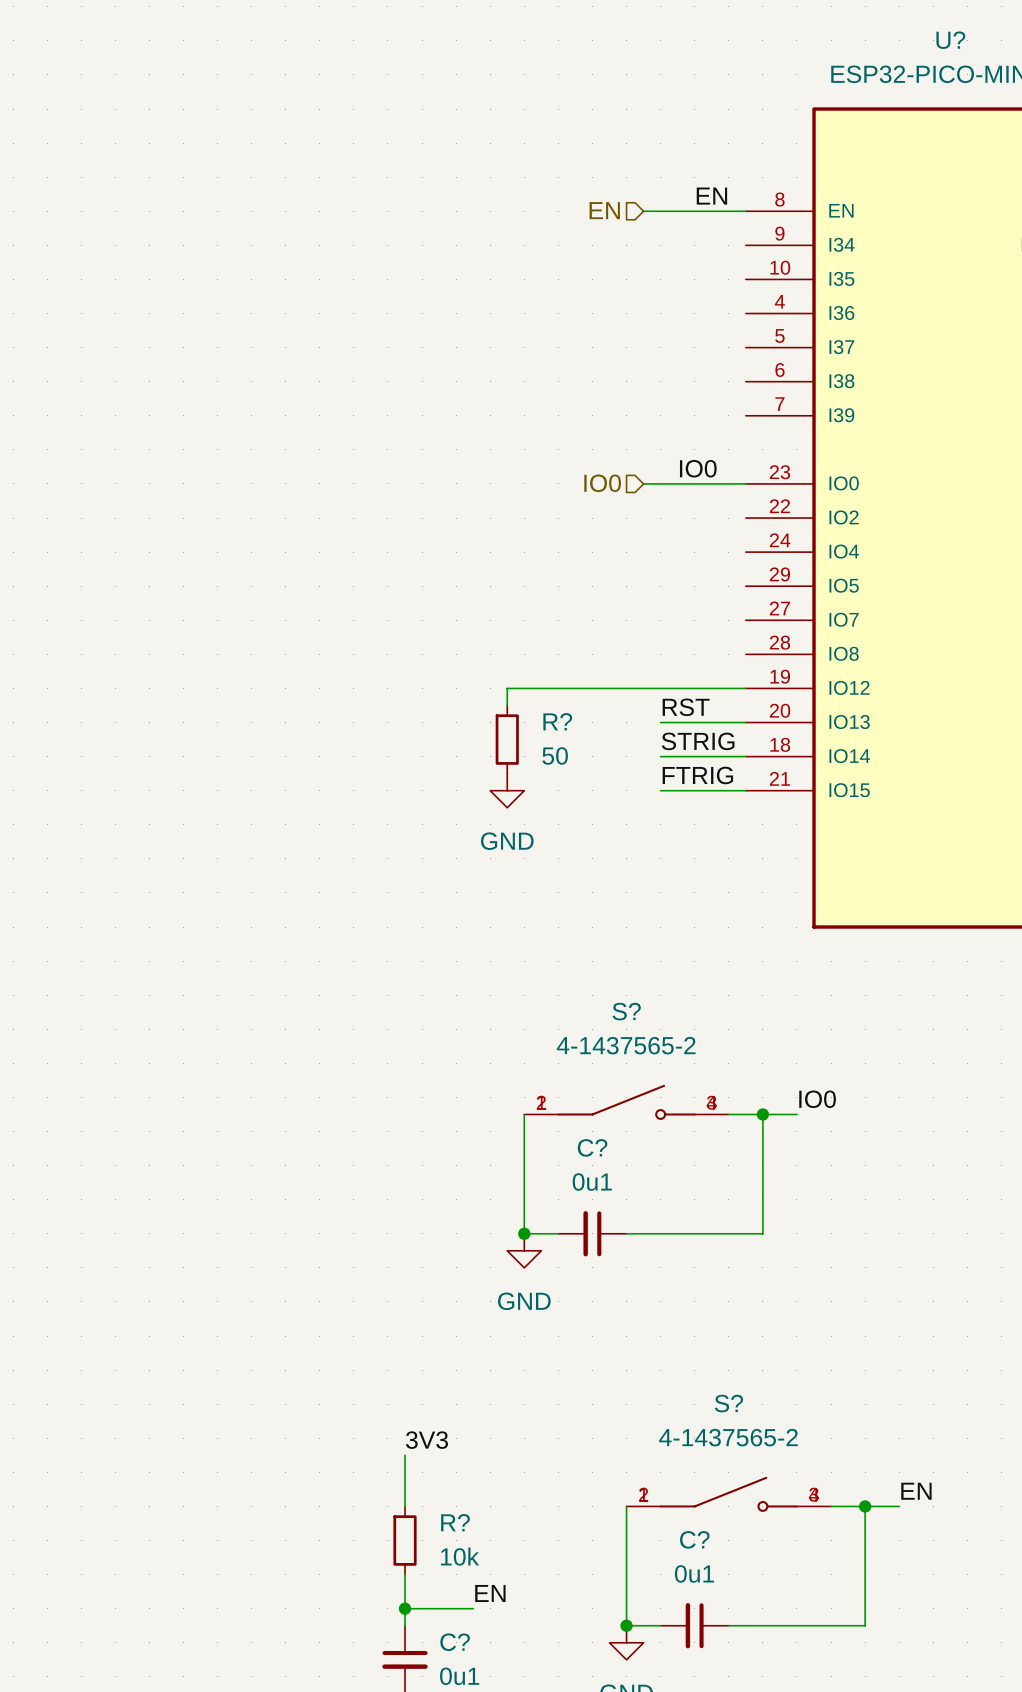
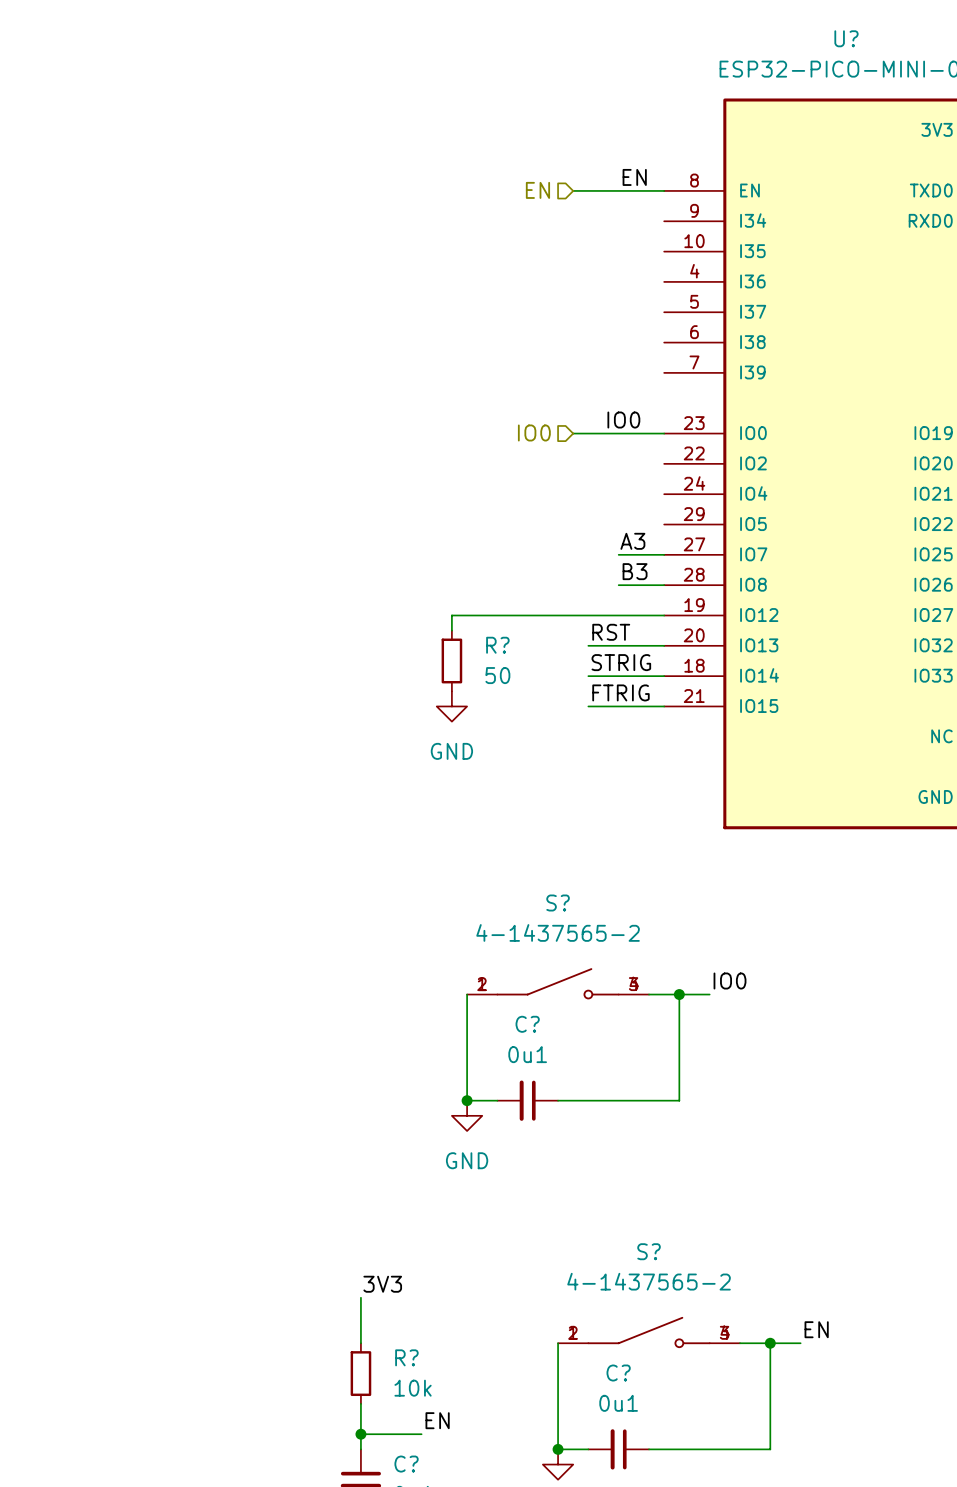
label: none -> A3 (632, 541)
wire: none -> (618, 554) (664, 554)
label: none -> B3 (635, 571)
wire: none -> (618, 585) (664, 585)

